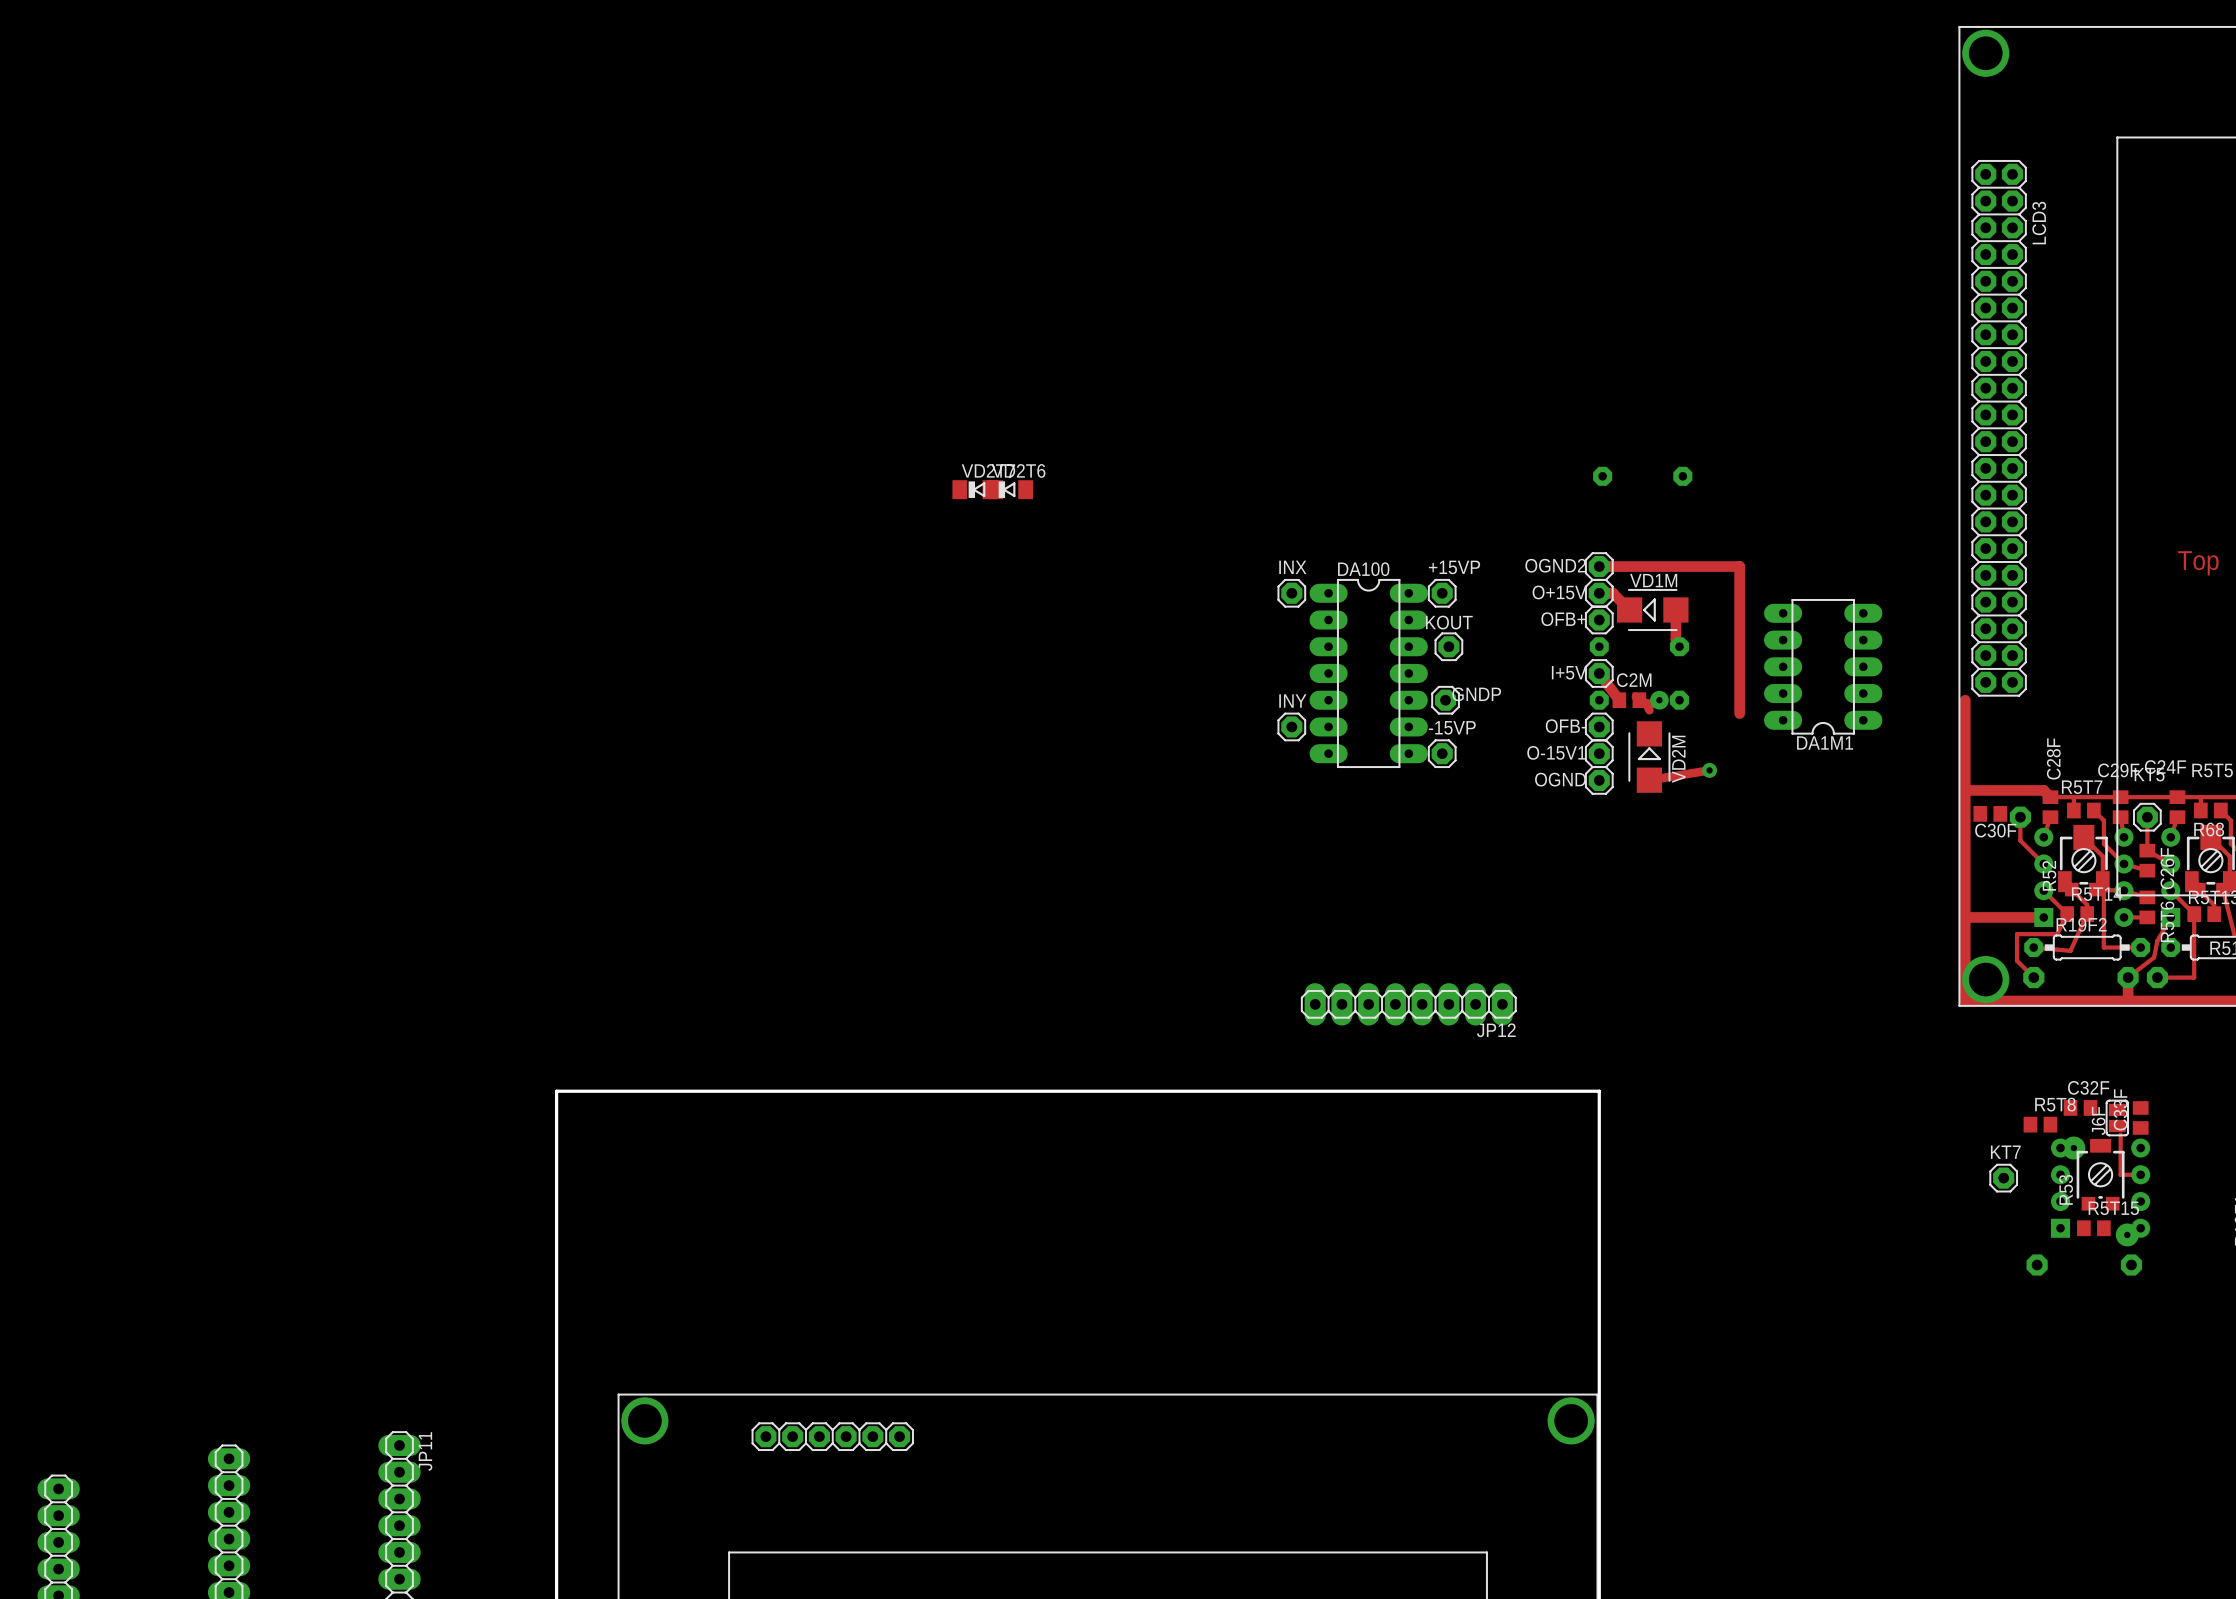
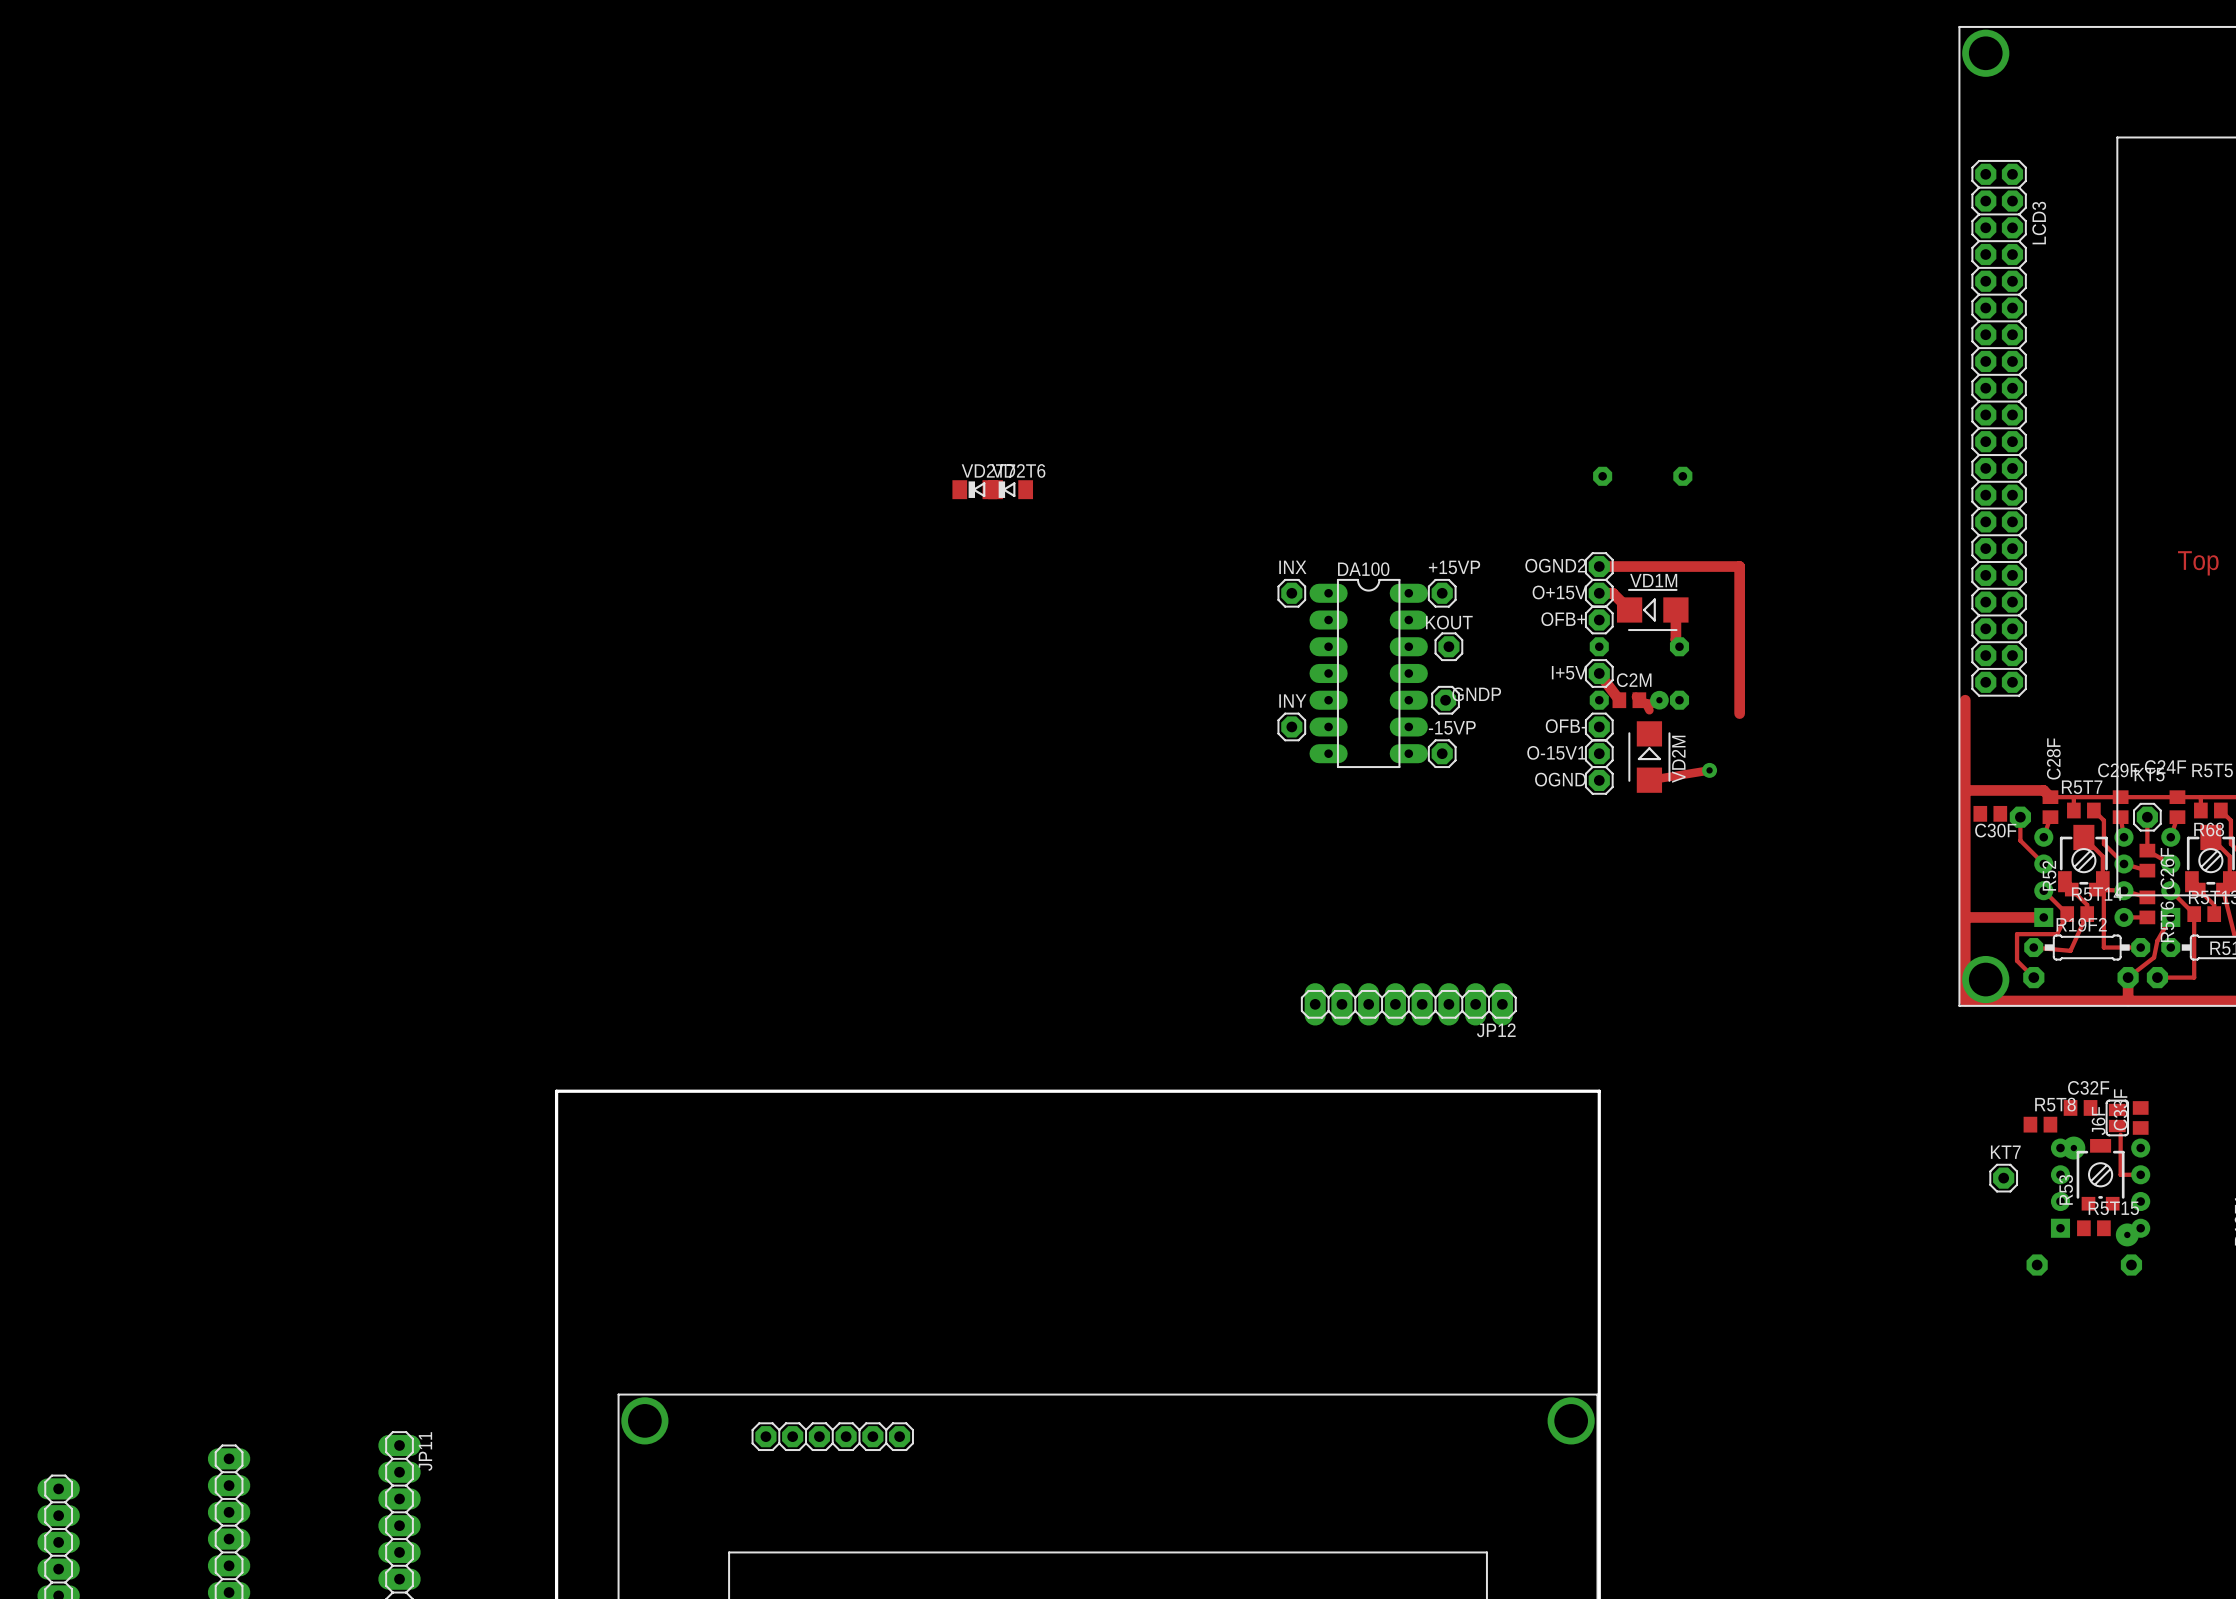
DA1M1: (1823, 666) -> none

